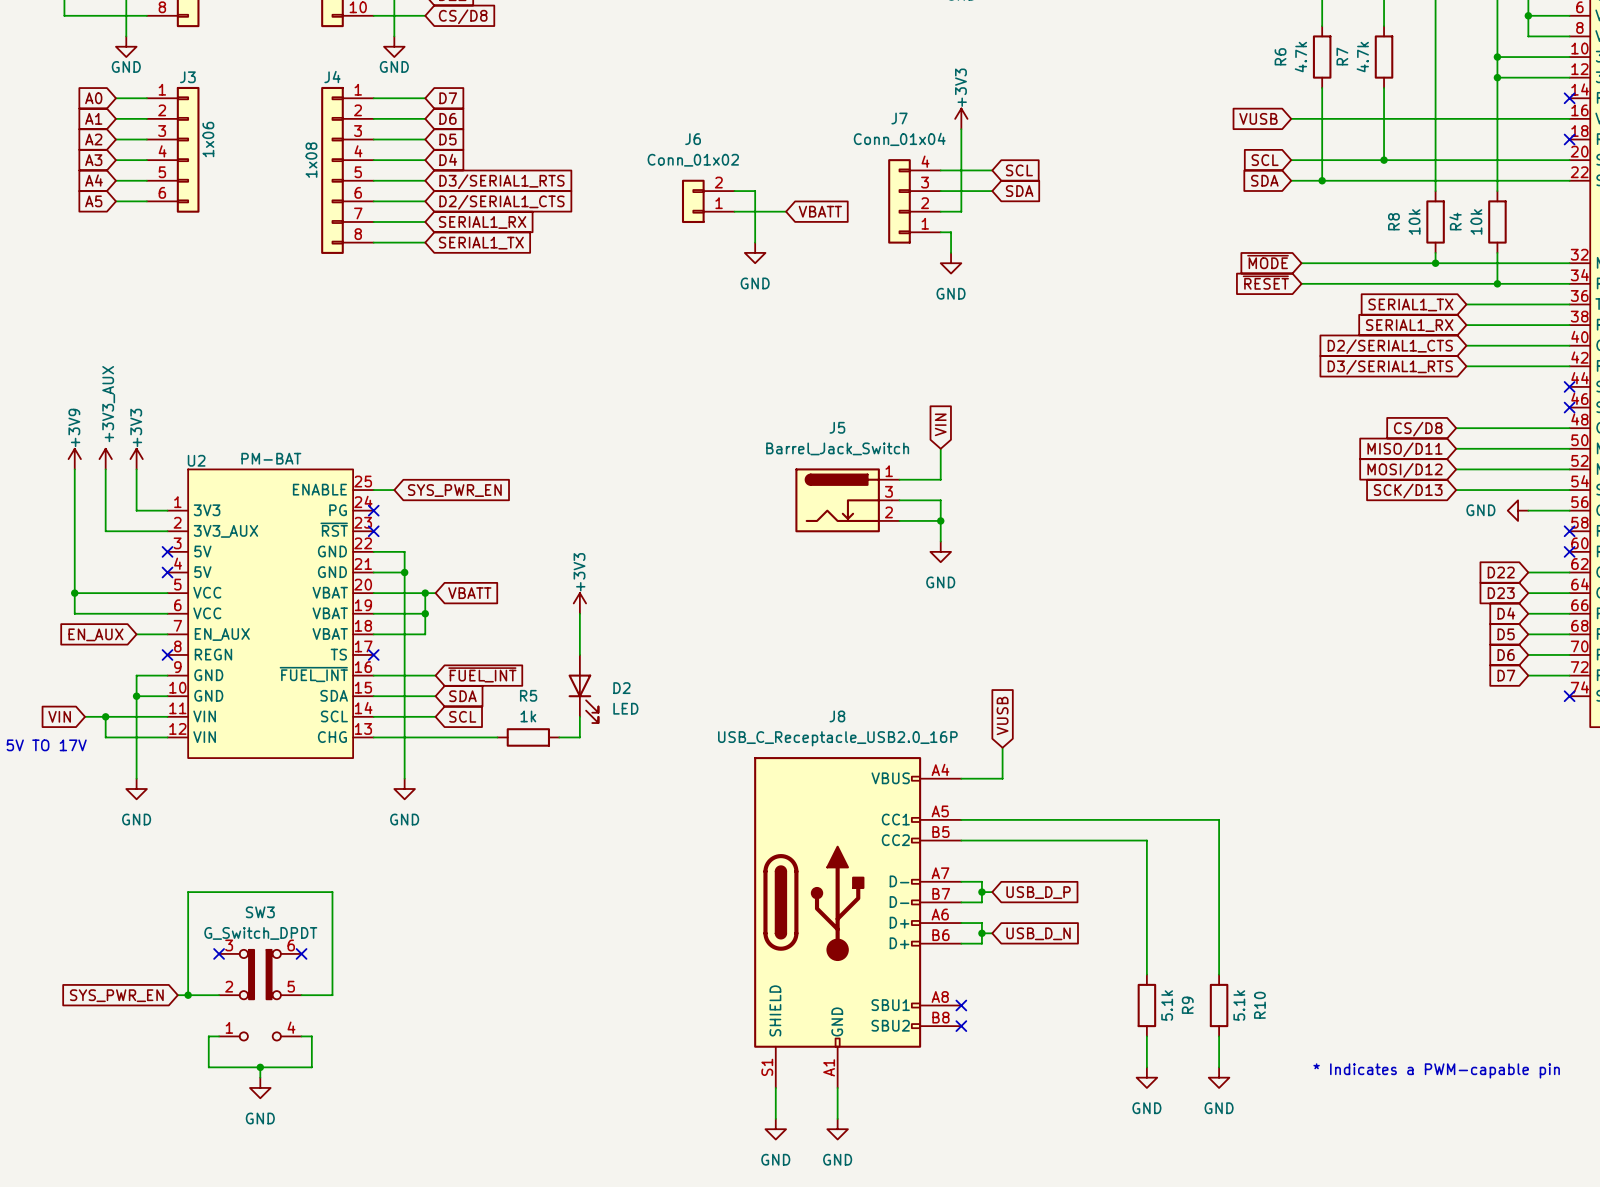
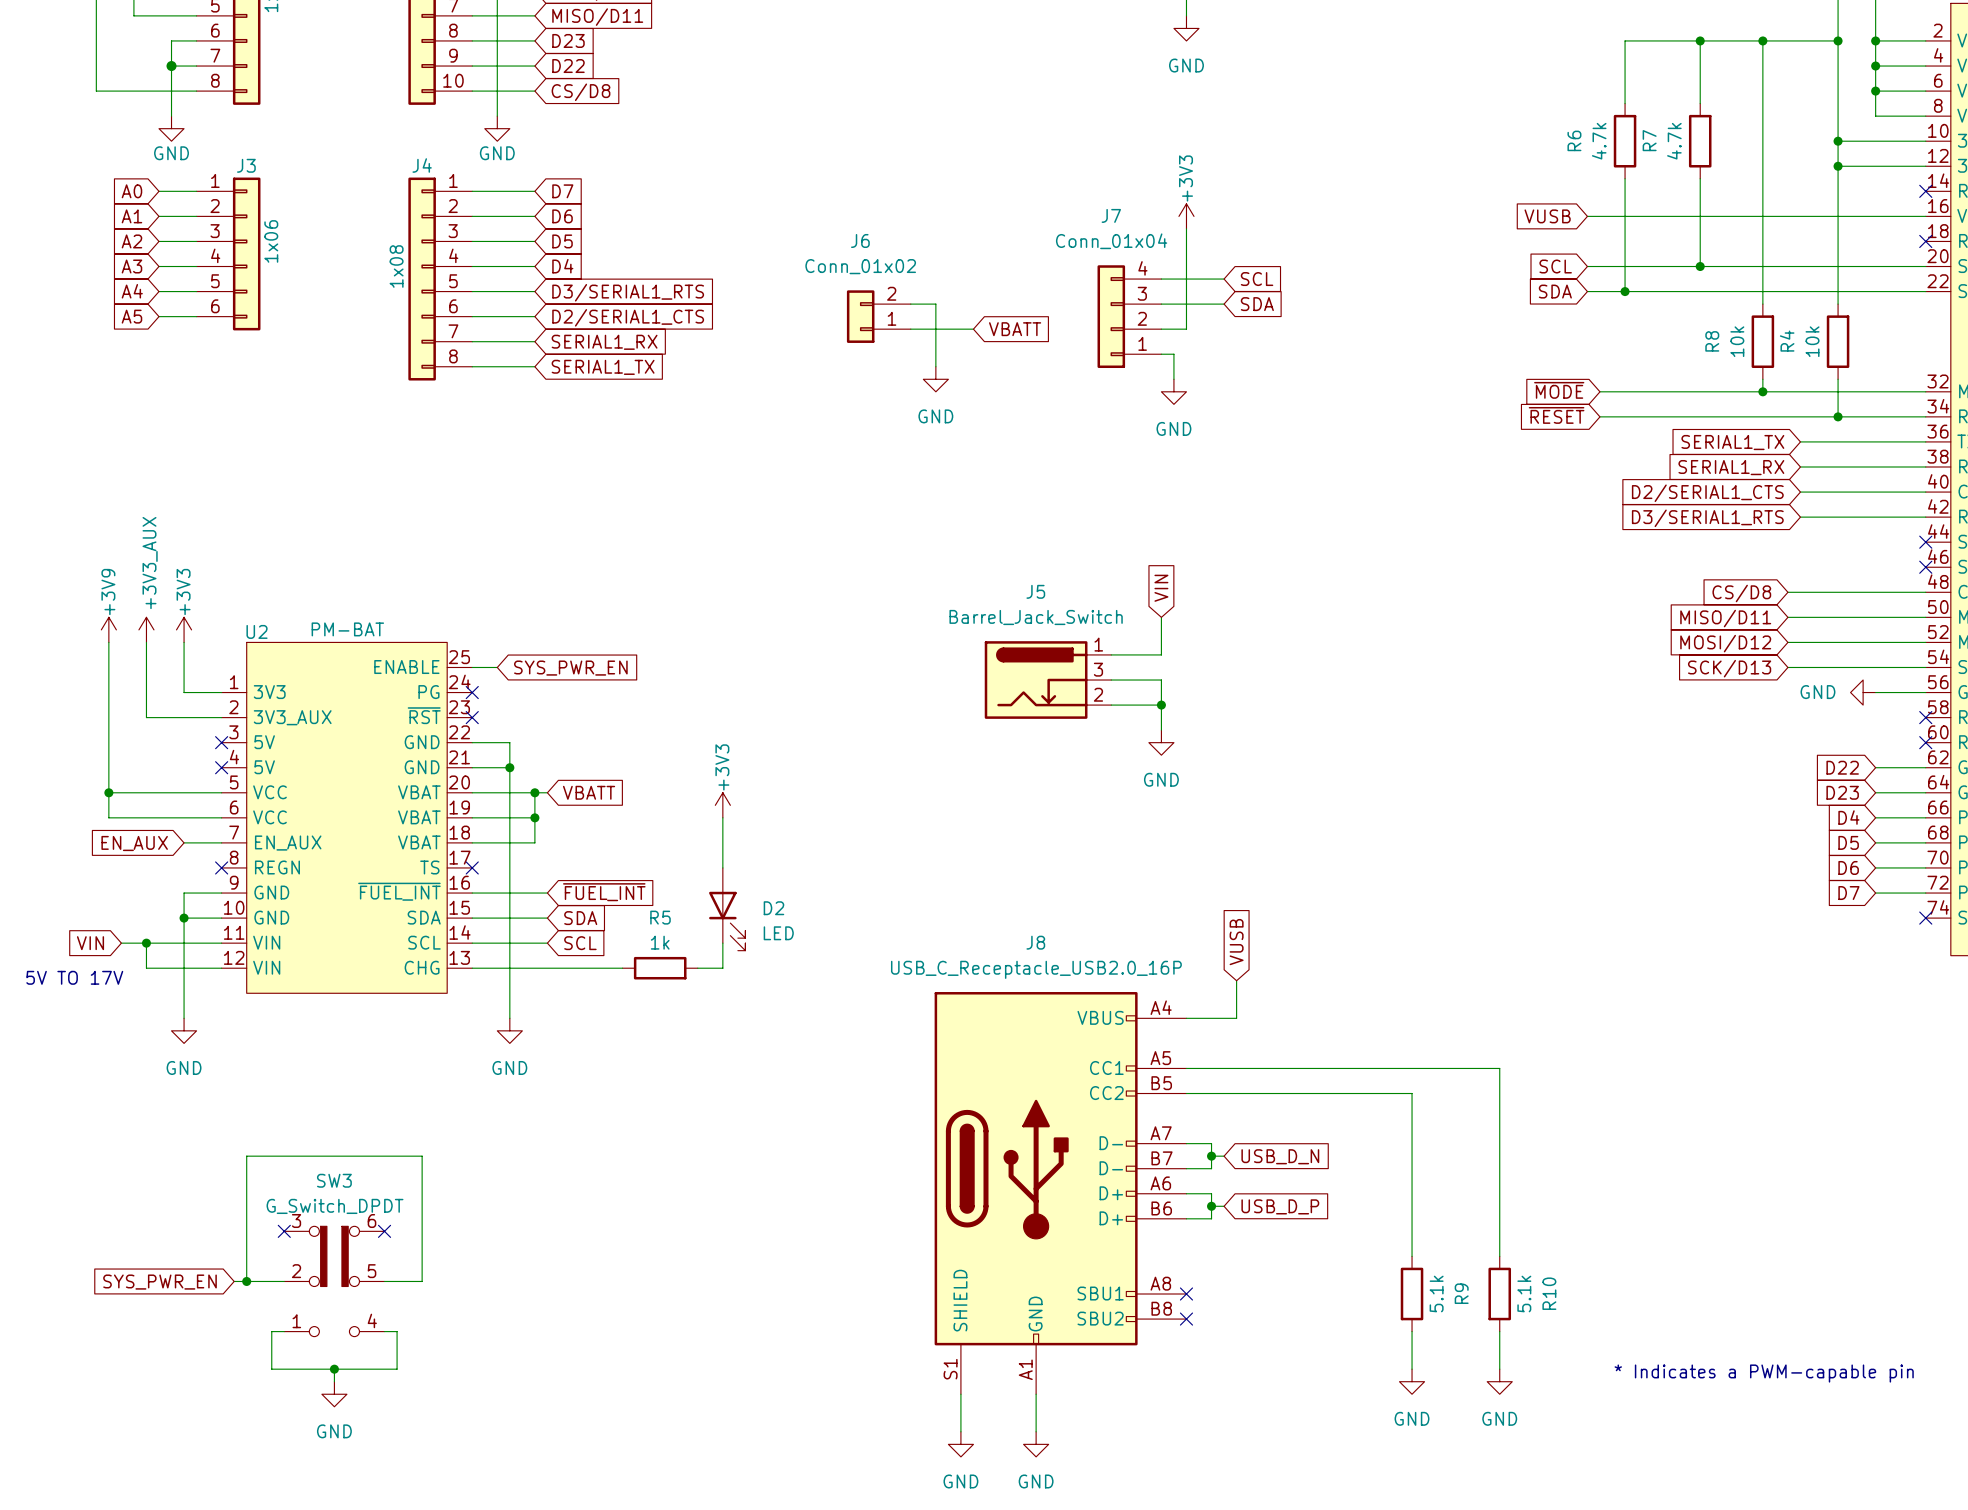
global label: USB_D_P (1038, 892) -> USB_D_N (1280, 1156)
global label: USB_D_N (1038, 933) -> USB_D_P (1280, 1206)

